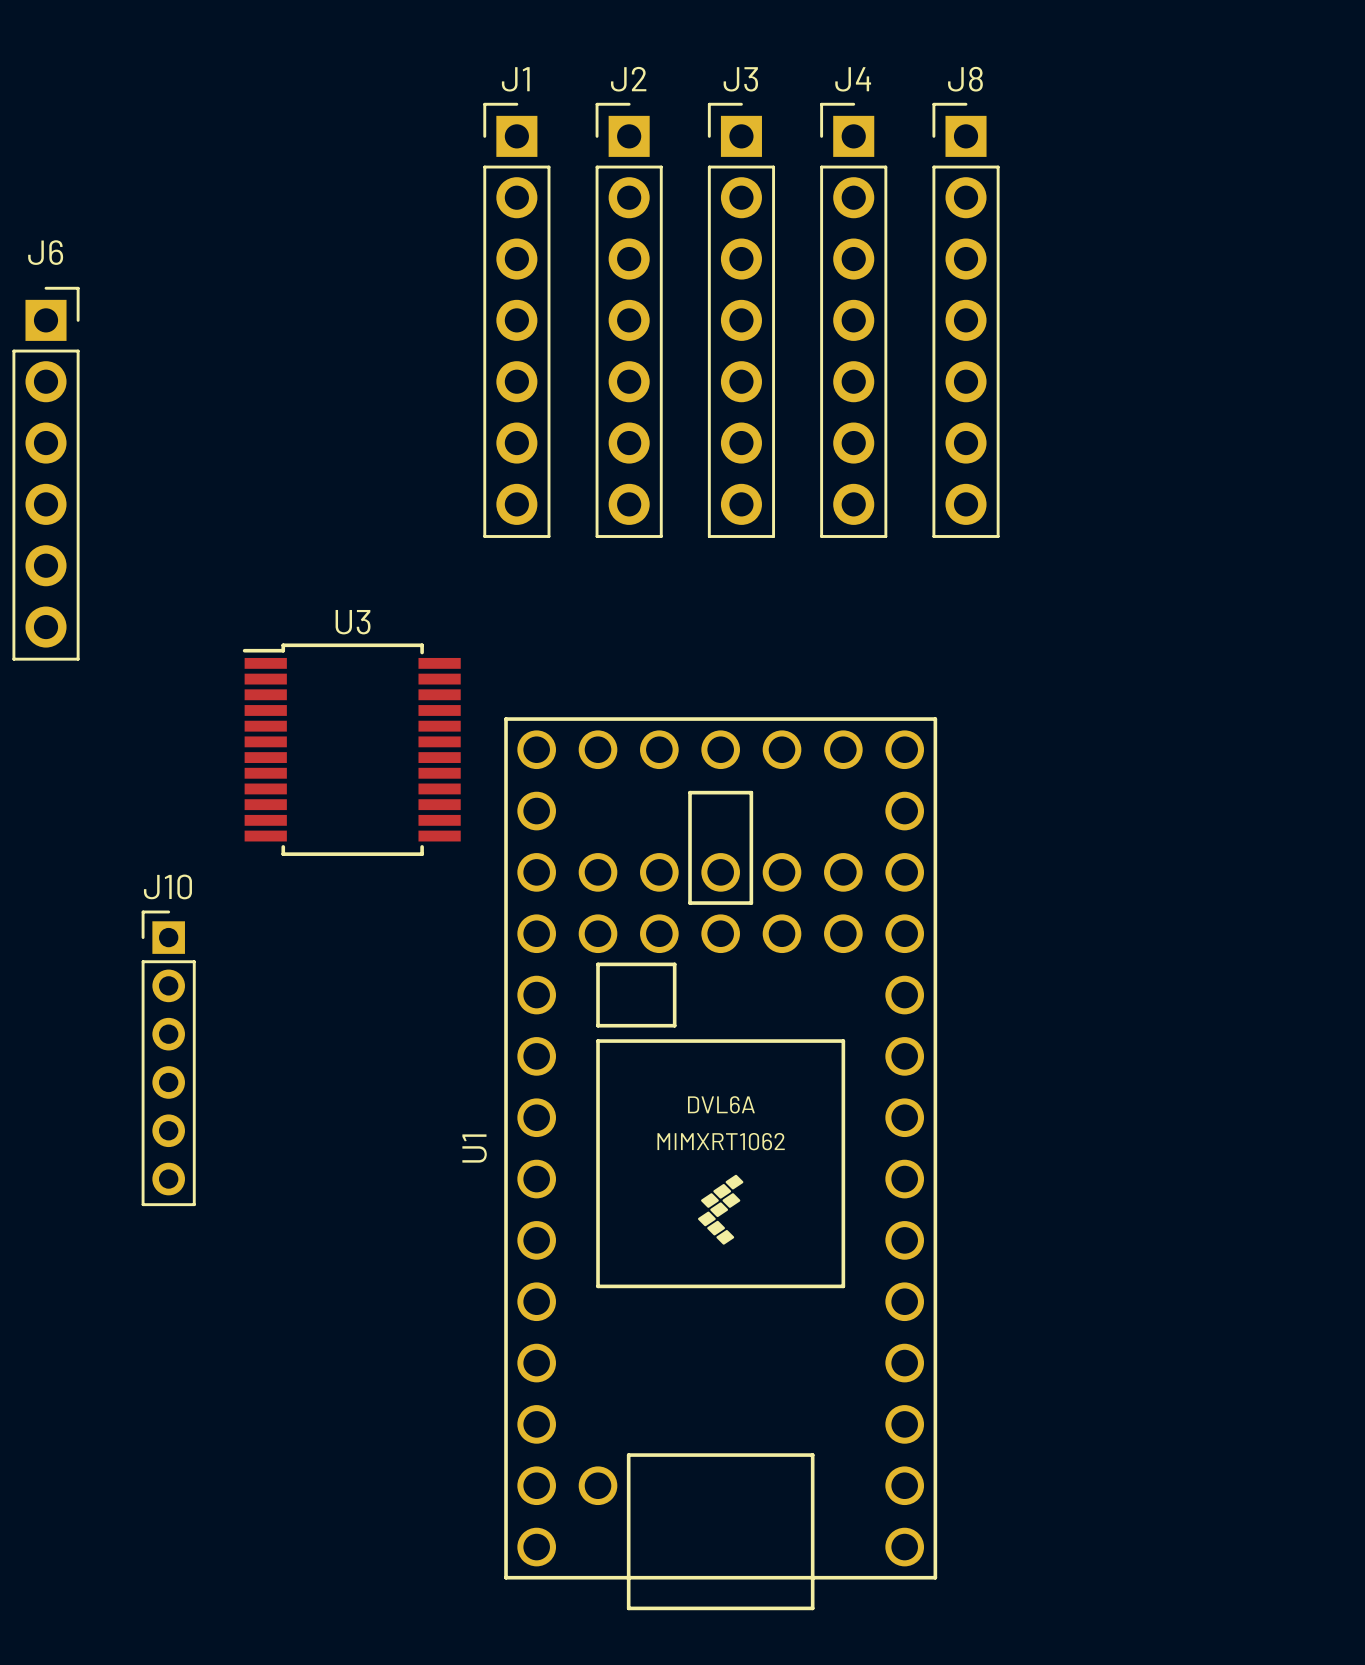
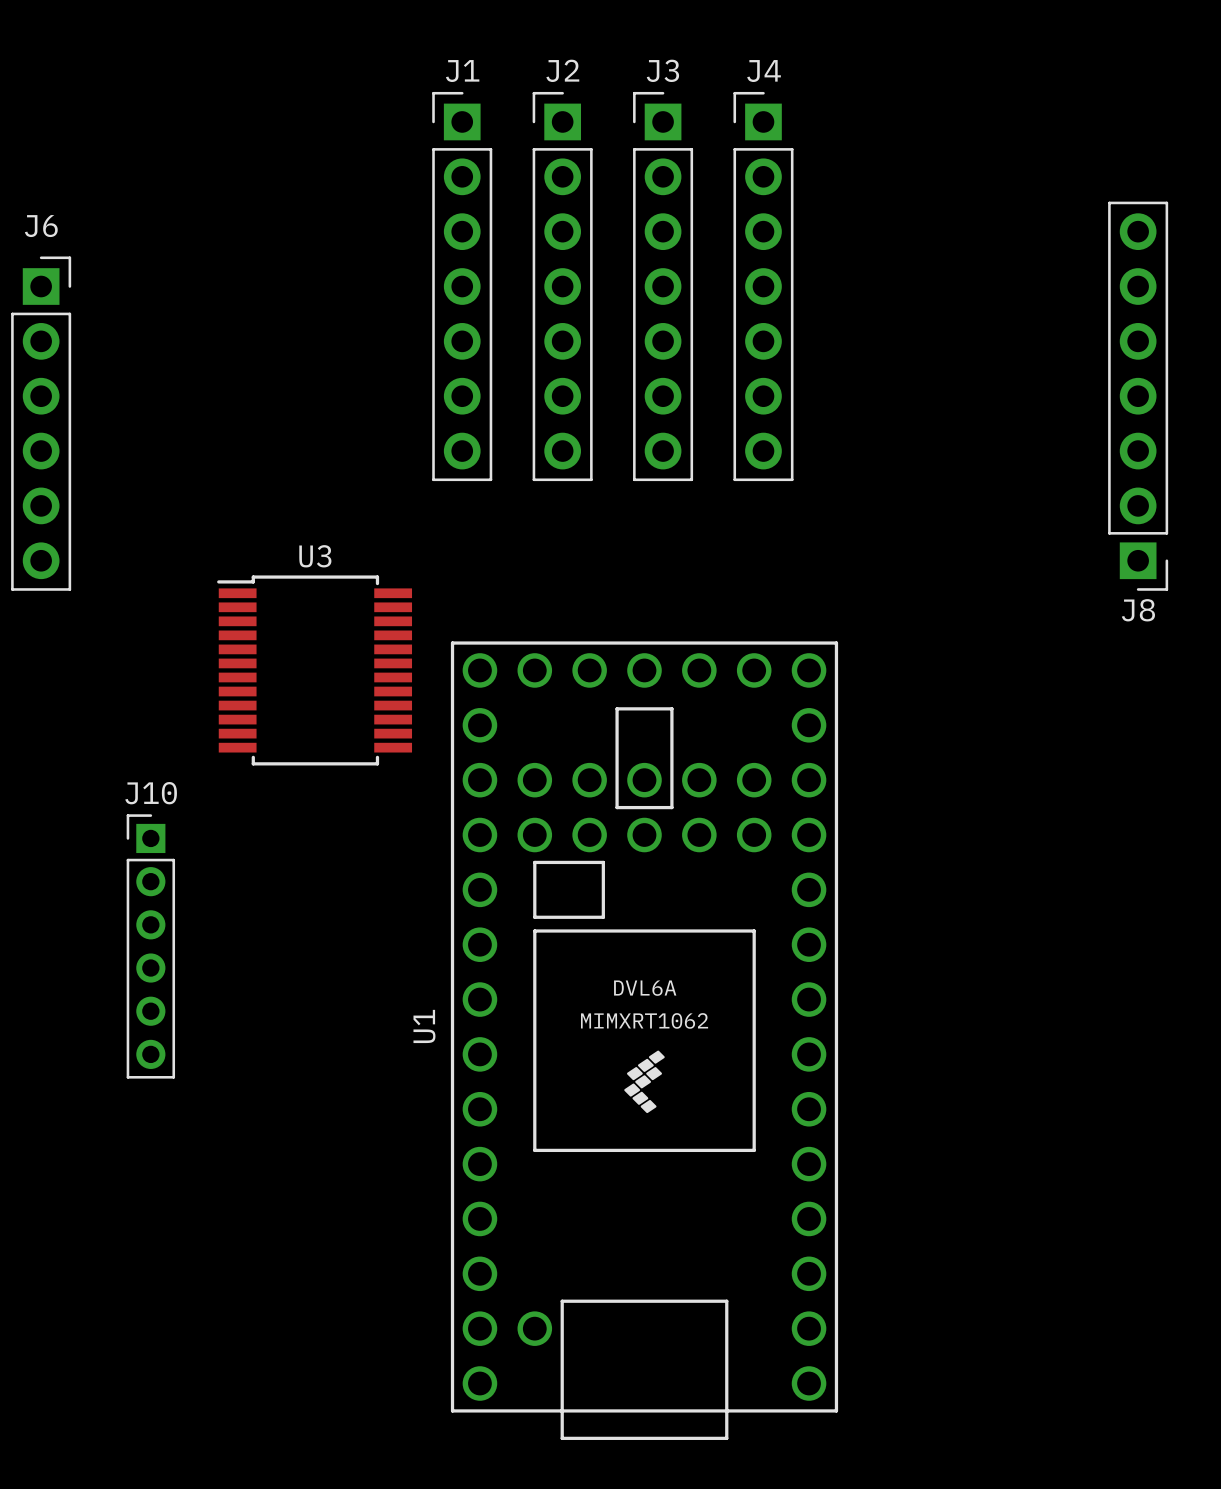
J8 rotation: 0° (966, 320) -> 180° (1138, 396)
J8 position: (966, 320) -> (1138, 396)

